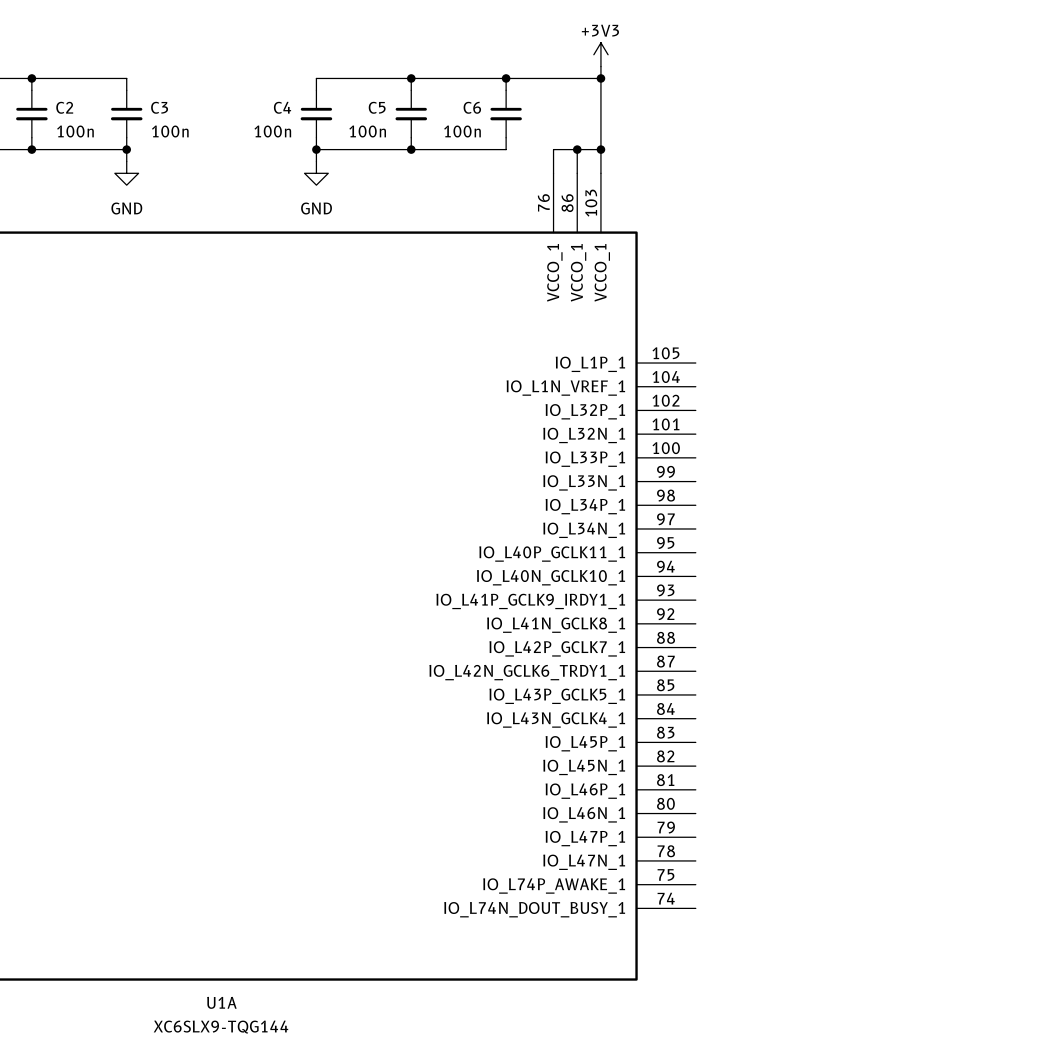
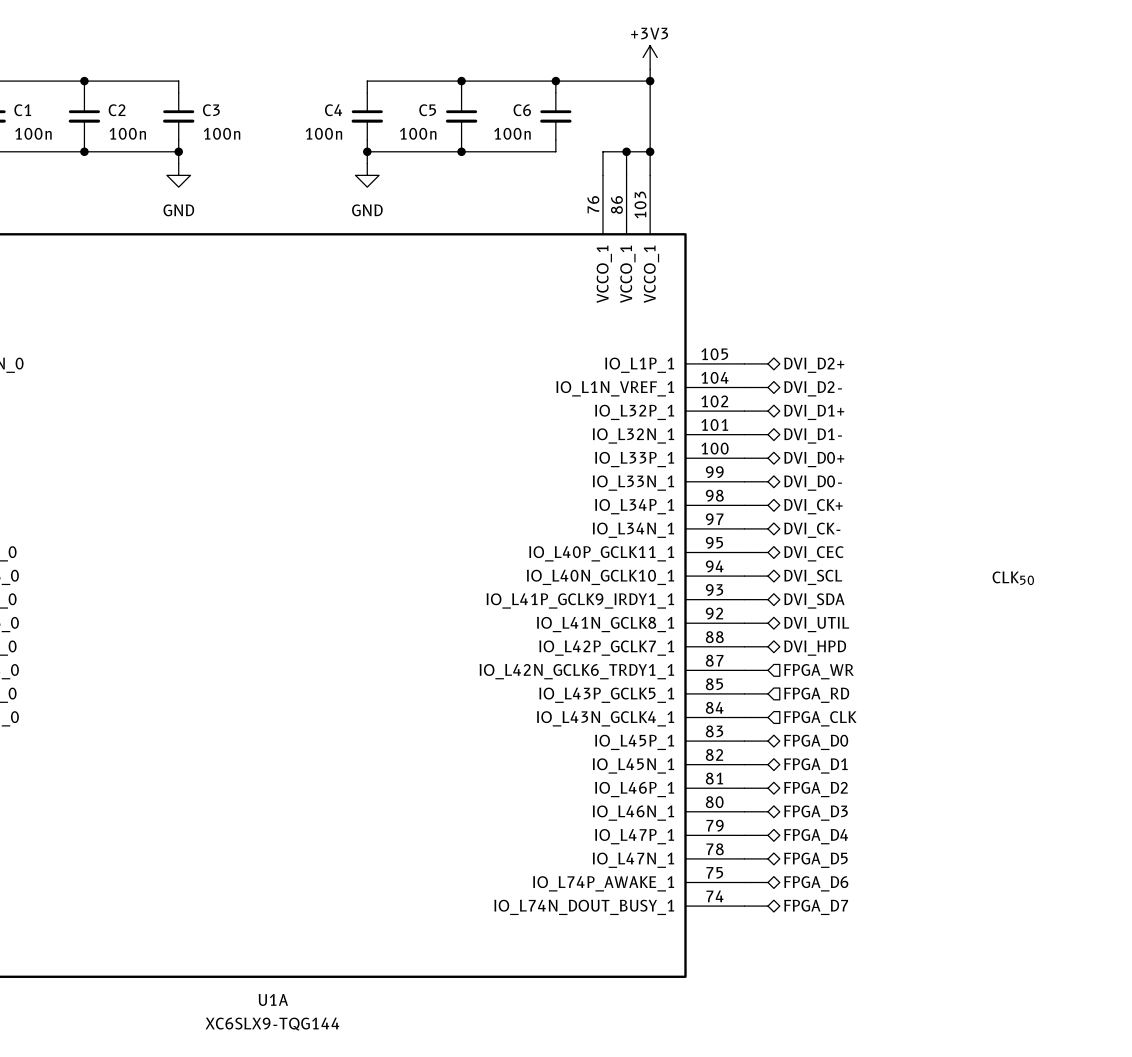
wire: none -> (744, 363) (768, 363)
hierarchical label: none -> DVI_D2+ (814, 365)
wire: none -> (744, 387) (768, 387)
hierarchical label: none -> DVI_D2- (813, 388)
wire: none -> (744, 411) (768, 411)
hierarchical label: none -> DVI_D1+ (814, 412)
wire: none -> (744, 434) (768, 434)
hierarchical label: none -> DVI_D1- (813, 435)
wire: none -> (744, 458) (768, 458)
hierarchical label: none -> DVI_D0+ (814, 459)
wire: none -> (744, 481) (768, 481)
hierarchical label: none -> DVI_D0- (813, 483)
wire: none -> (744, 505) (768, 505)
hierarchical label: none -> DVI_CK+ (813, 506)
wire: none -> (744, 528) (768, 528)
hierarchical label: none -> DVI_CK- (812, 530)
wire: none -> (744, 552) (768, 552)
hierarchical label: none -> DVI_CEC (813, 553)
wire: none -> (744, 576) (768, 576)
hierarchical label: none -> DVI_SCL (813, 577)
label: none -> CLK50 (1013, 578)
wire: none -> (744, 599) (768, 599)
hierarchical label: none -> DVI_SDA (814, 600)
wire: none -> (744, 623) (768, 623)
hierarchical label: none -> DVI_UTIL (816, 624)
wire: none -> (744, 646) (768, 646)
hierarchical label: none -> DVI_HPD (815, 648)
wire: none -> (744, 670) (768, 670)
hierarchical label: none -> FPGA_WR (818, 671)
wire: none -> (744, 693) (768, 693)
hierarchical label: none -> FPGA_RD (816, 695)
wire: none -> (744, 717) (768, 717)
hierarchical label: none -> FPGA_CLK (820, 718)
wire: none -> (744, 741) (768, 741)
hierarchical label: none -> FPGA_D0 (816, 742)
wire: none -> (744, 764) (768, 764)
hierarchical label: none -> FPGA_D1 (815, 765)
wire: none -> (744, 788) (768, 788)
hierarchical label: none -> FPGA_D2 (815, 789)
wire: none -> (744, 811) (768, 811)
hierarchical label: none -> FPGA_D3 (815, 813)
wire: none -> (744, 835) (768, 835)
hierarchical label: none -> FPGA_D4 (816, 836)
wire: none -> (744, 858) (768, 858)
hierarchical label: none -> FPGA_D5 (815, 860)
wire: none -> (744, 882) (768, 882)
hierarchical label: none -> FPGA_D6 (816, 883)
wire: none -> (744, 906) (768, 906)
hierarchical label: none -> FPGA_D7 (816, 907)

